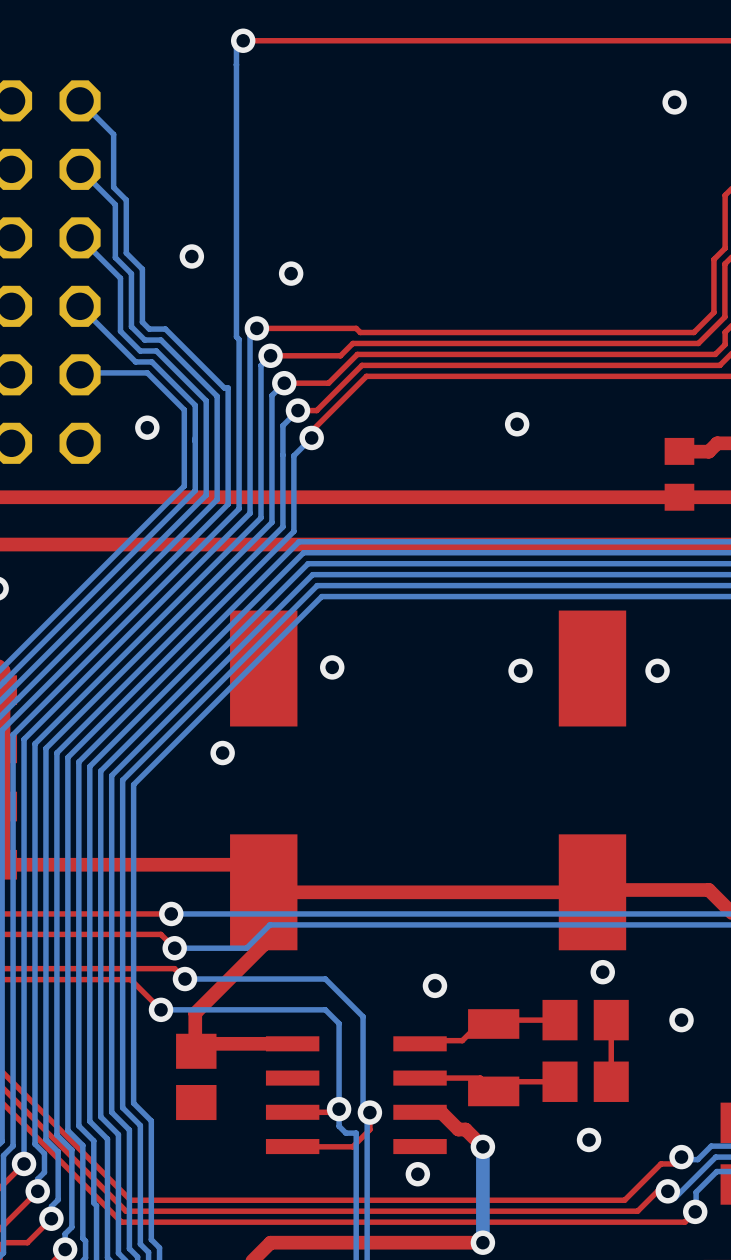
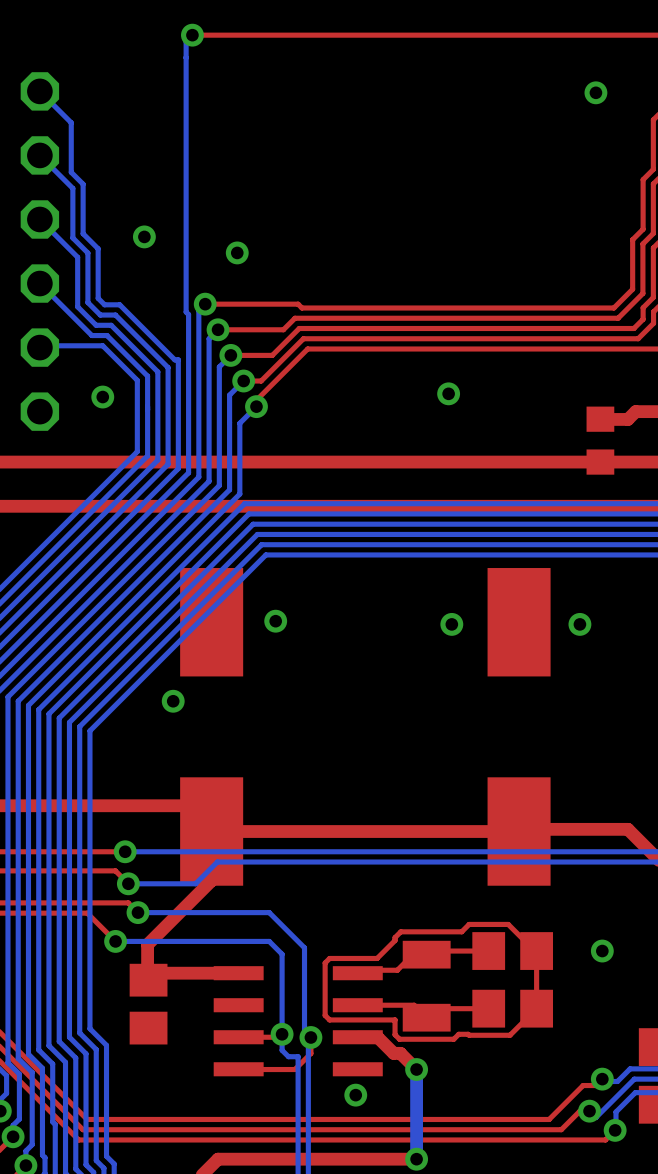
via: (602, 972) -> none
via: (434, 985) -> none
top track: none -> (536, 951) (508, 924) (469, 924) (461, 931) (400, 931) (377, 958) (329, 958) (325, 962) (325, 1015) (329, 1019) (395, 1019) (395, 1034) (399, 1039) (453, 1039) (458, 1034) (510, 1035) (536, 1008)
via: (589, 1139) -> none

